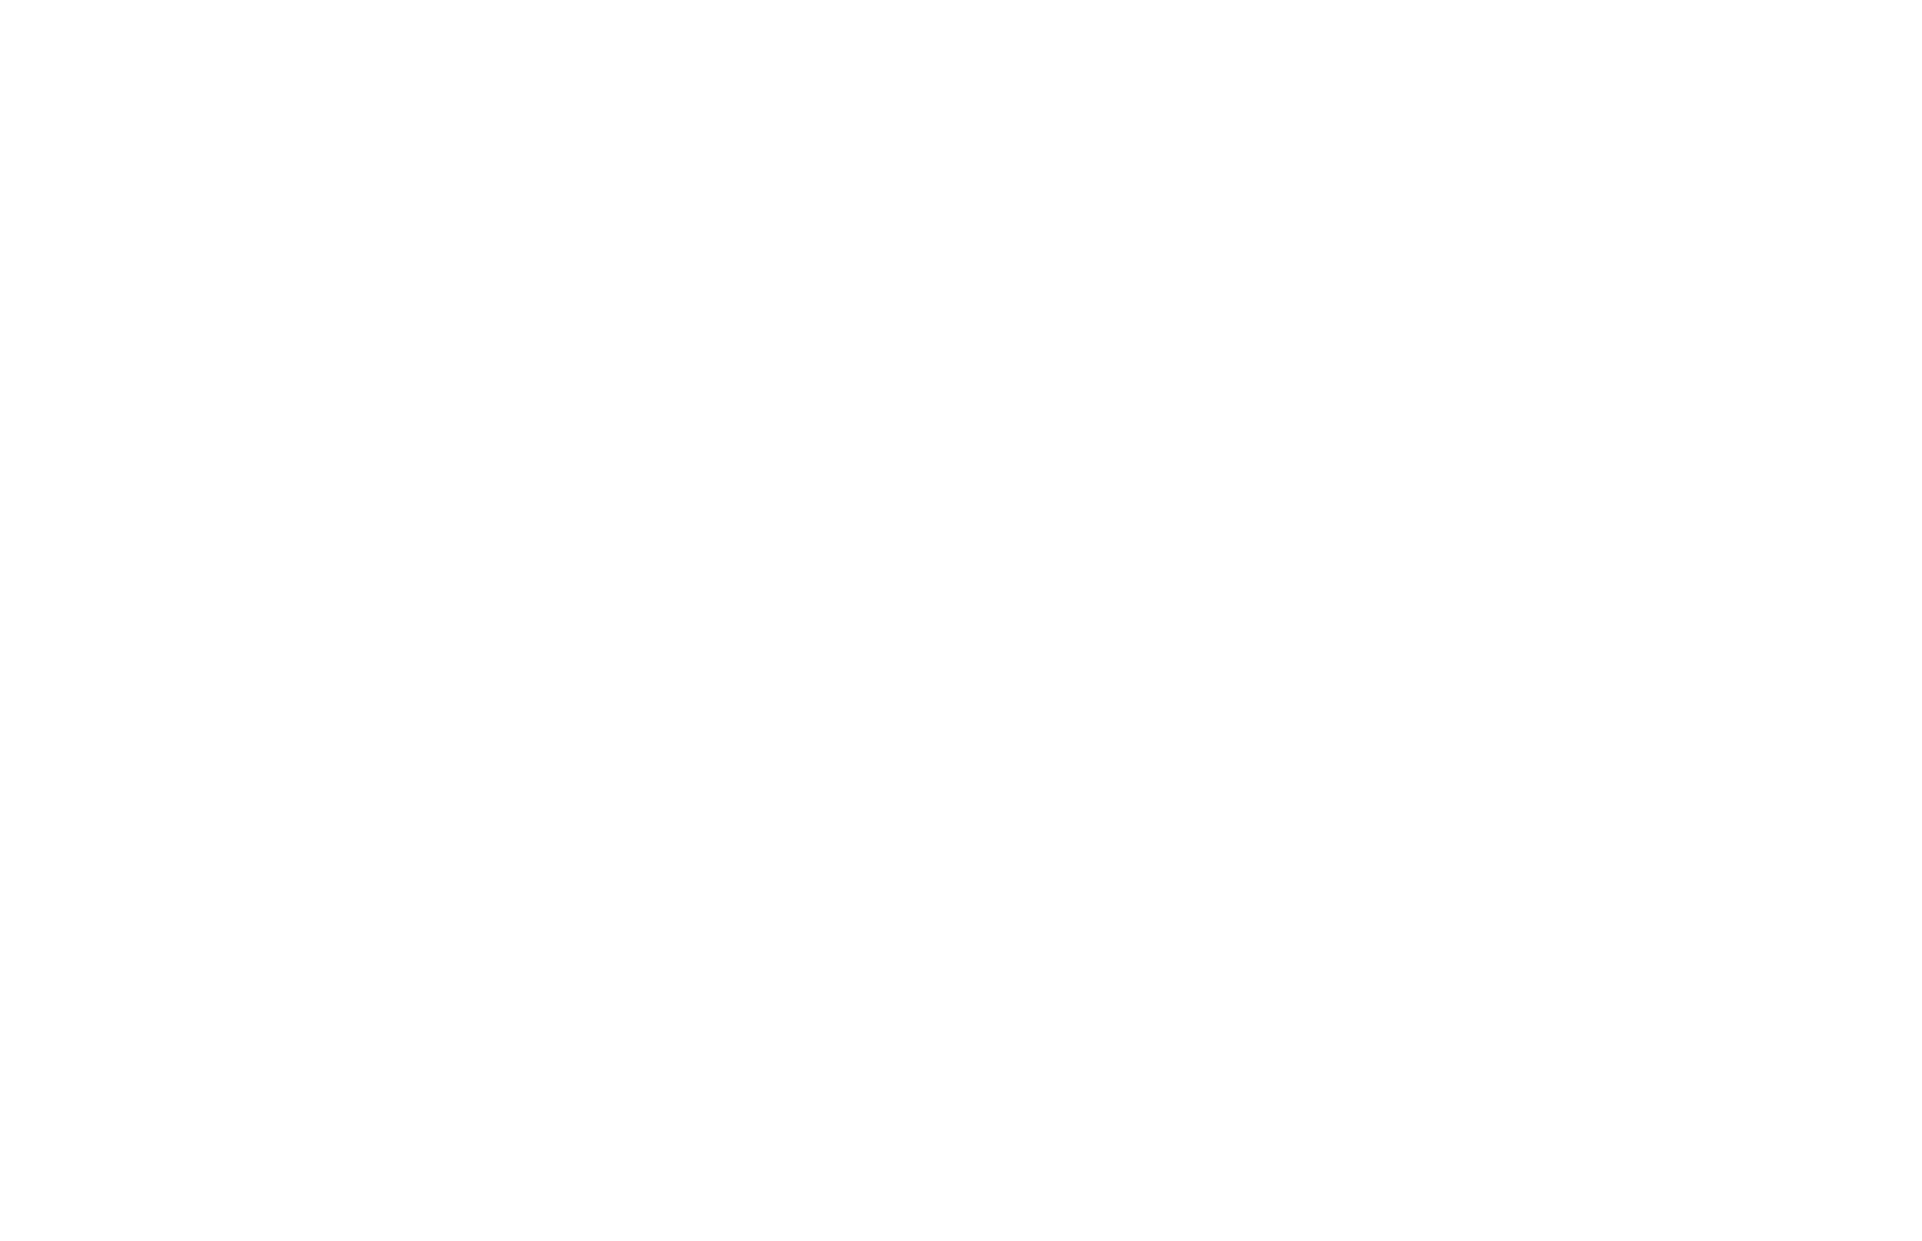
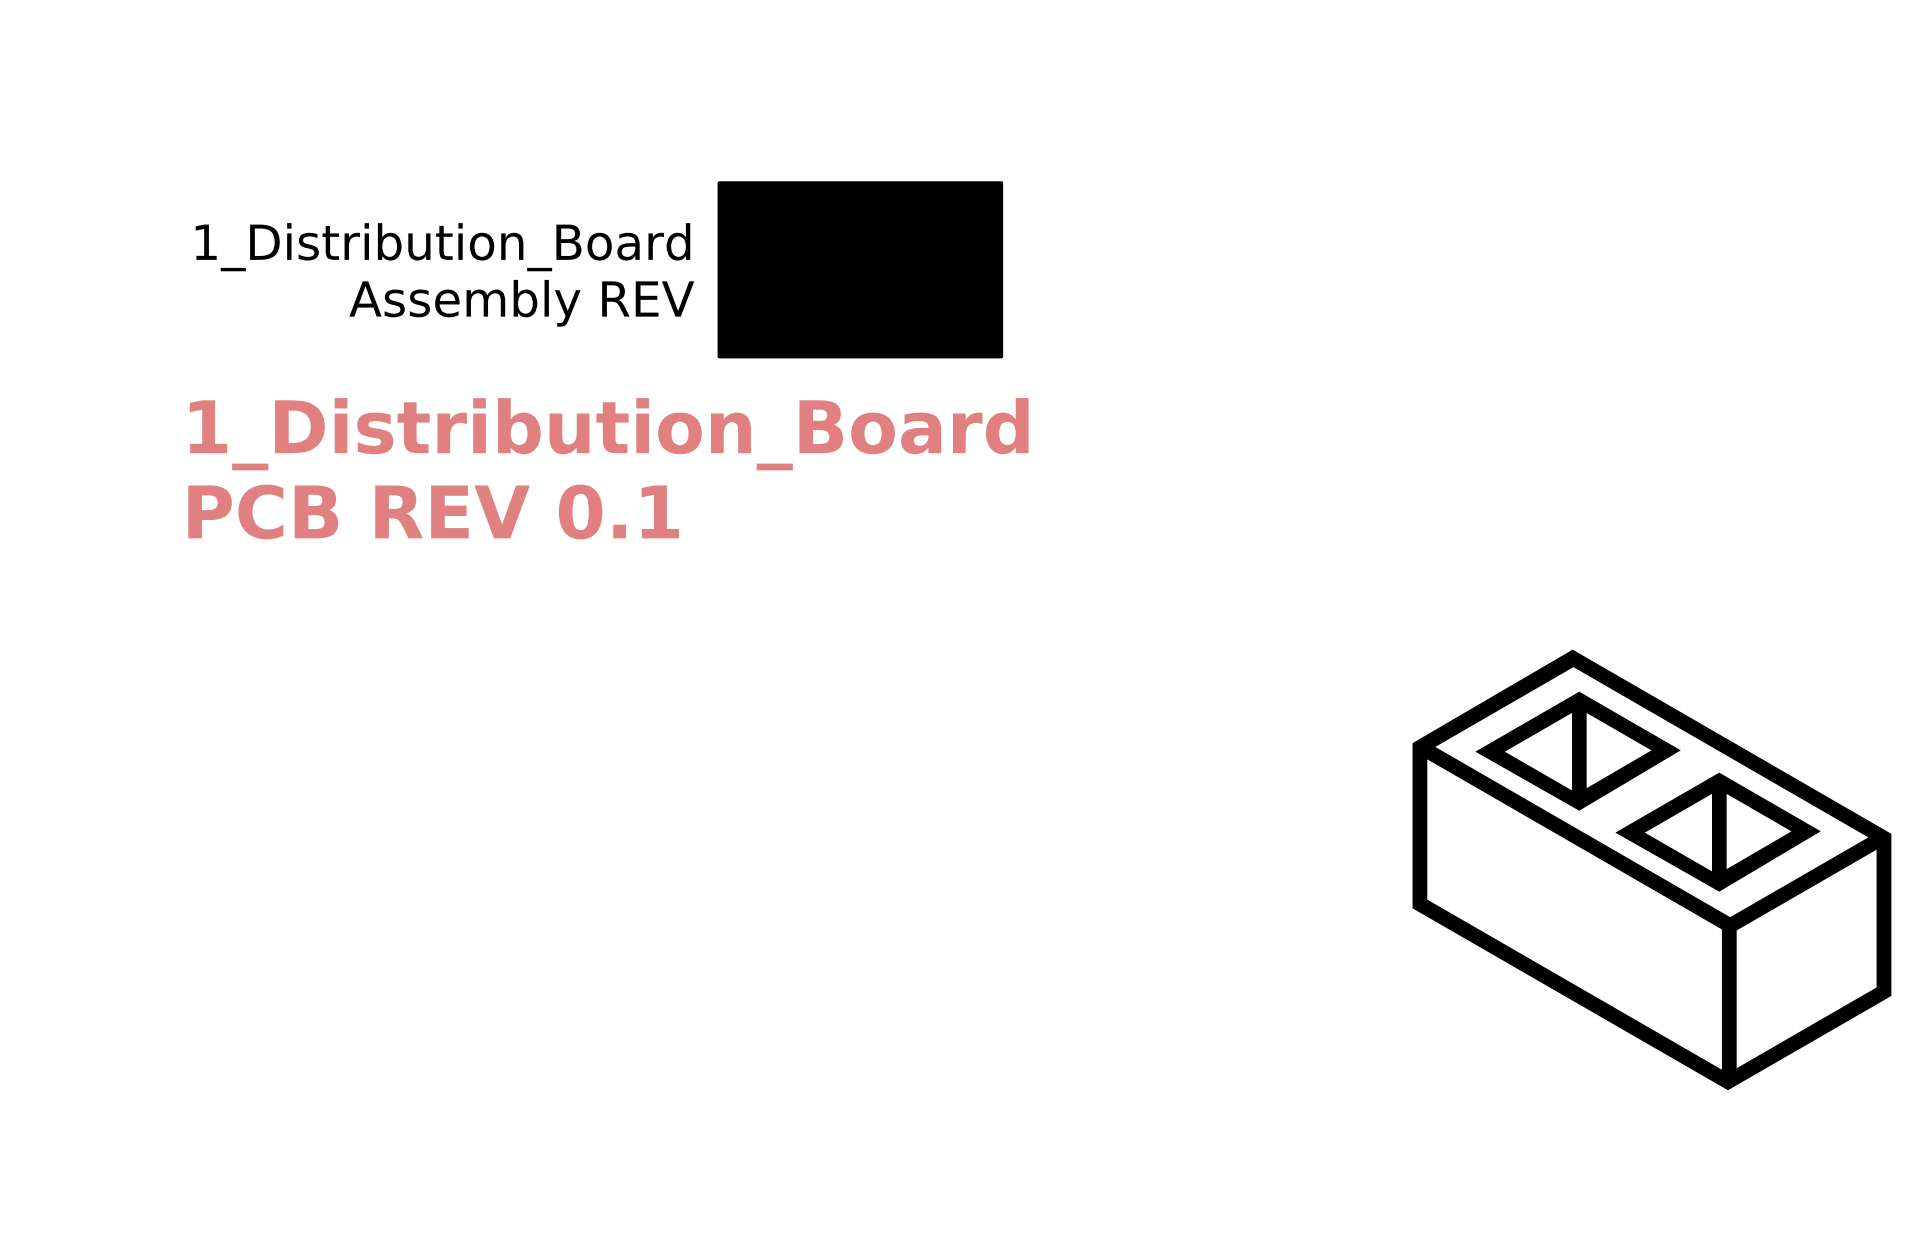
drawing: none -> [717, 181, 1004, 359]
text: none -> 1_Distribution_Board (442, 247)
text: none -> Assembly REV (521, 303)
text: none -> 1_Distribution_Board (609, 434)
text: none -> PCB REV 0.1 (433, 511)
drawing: none -> [1412, 649, 1892, 1091]

